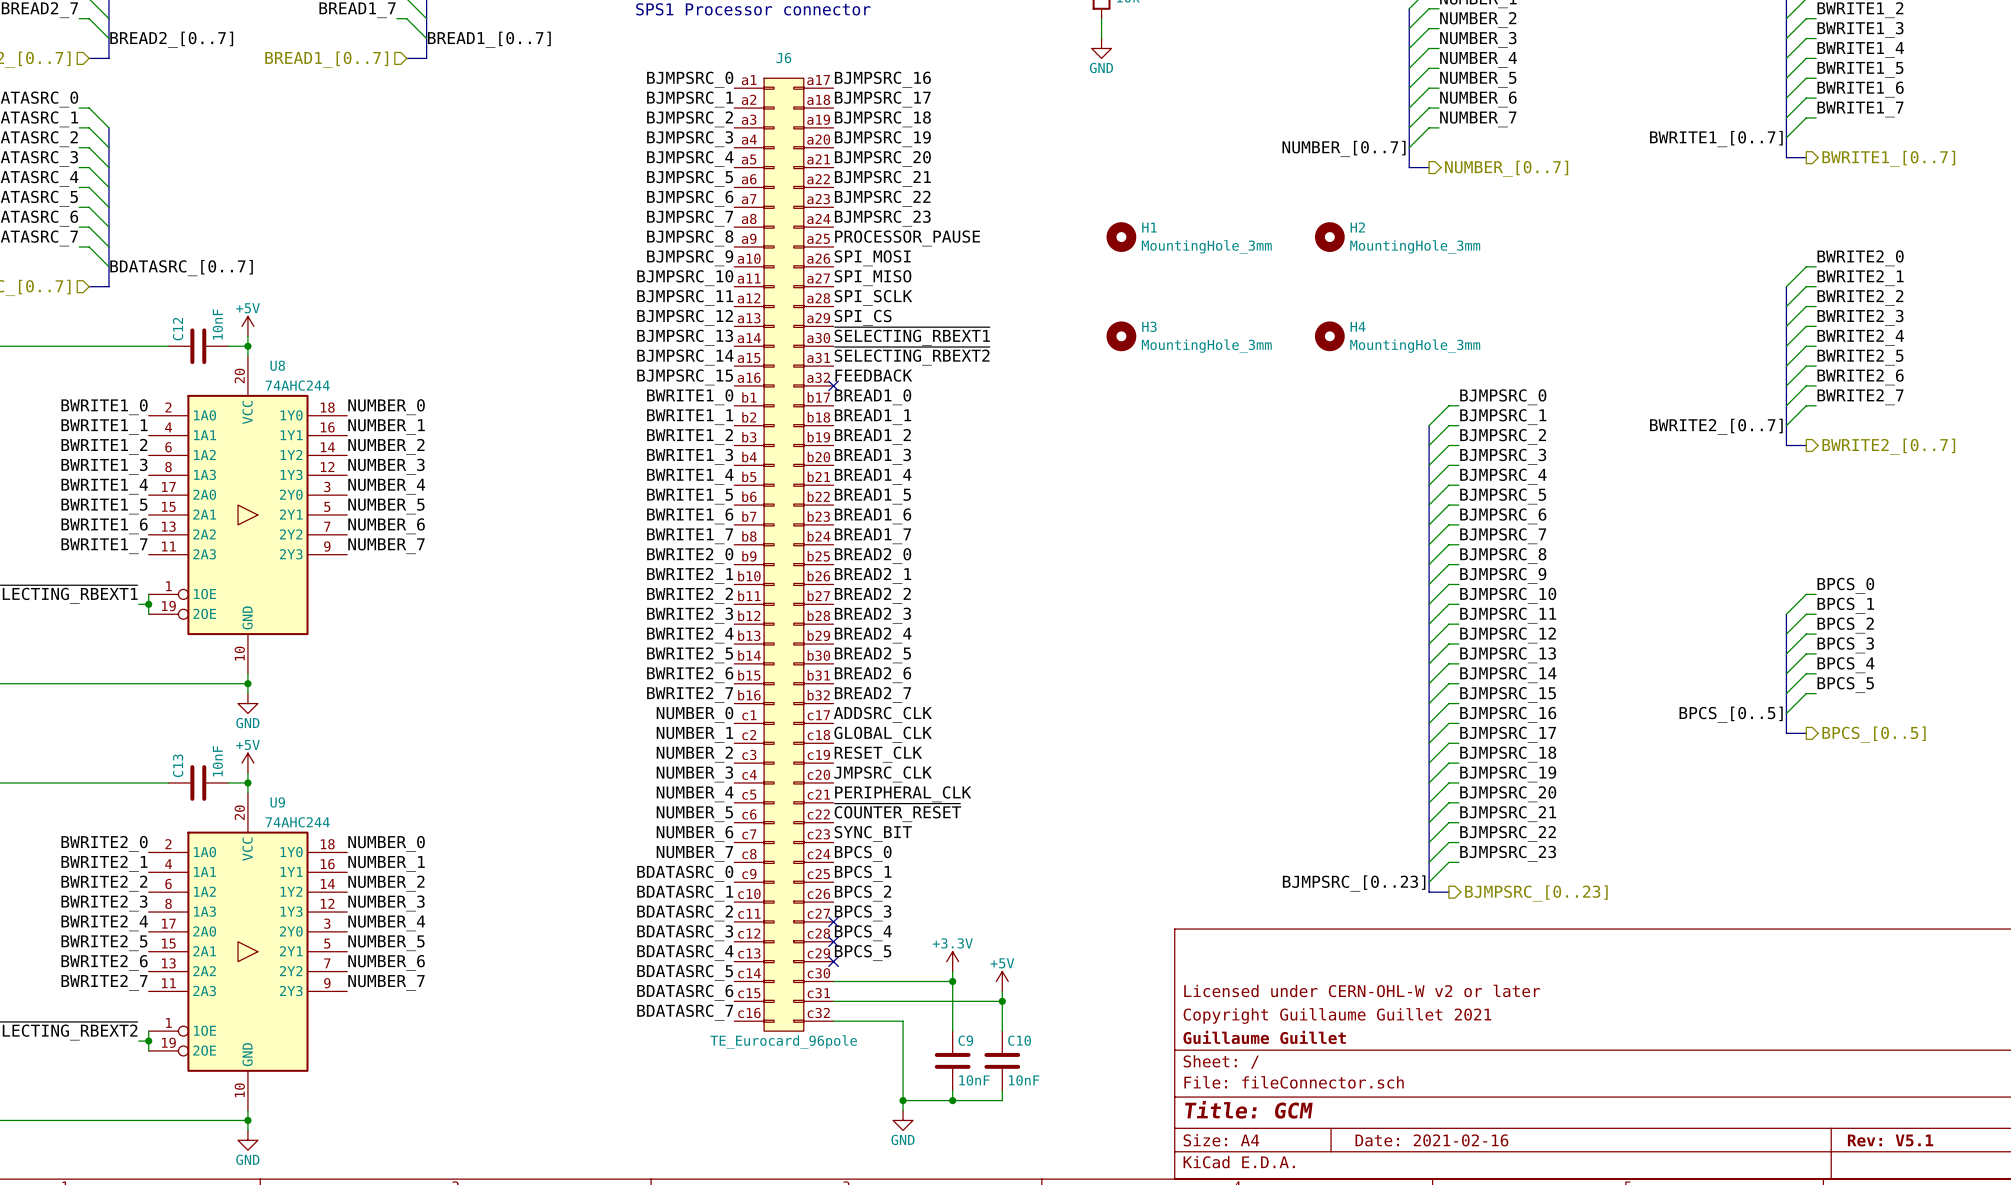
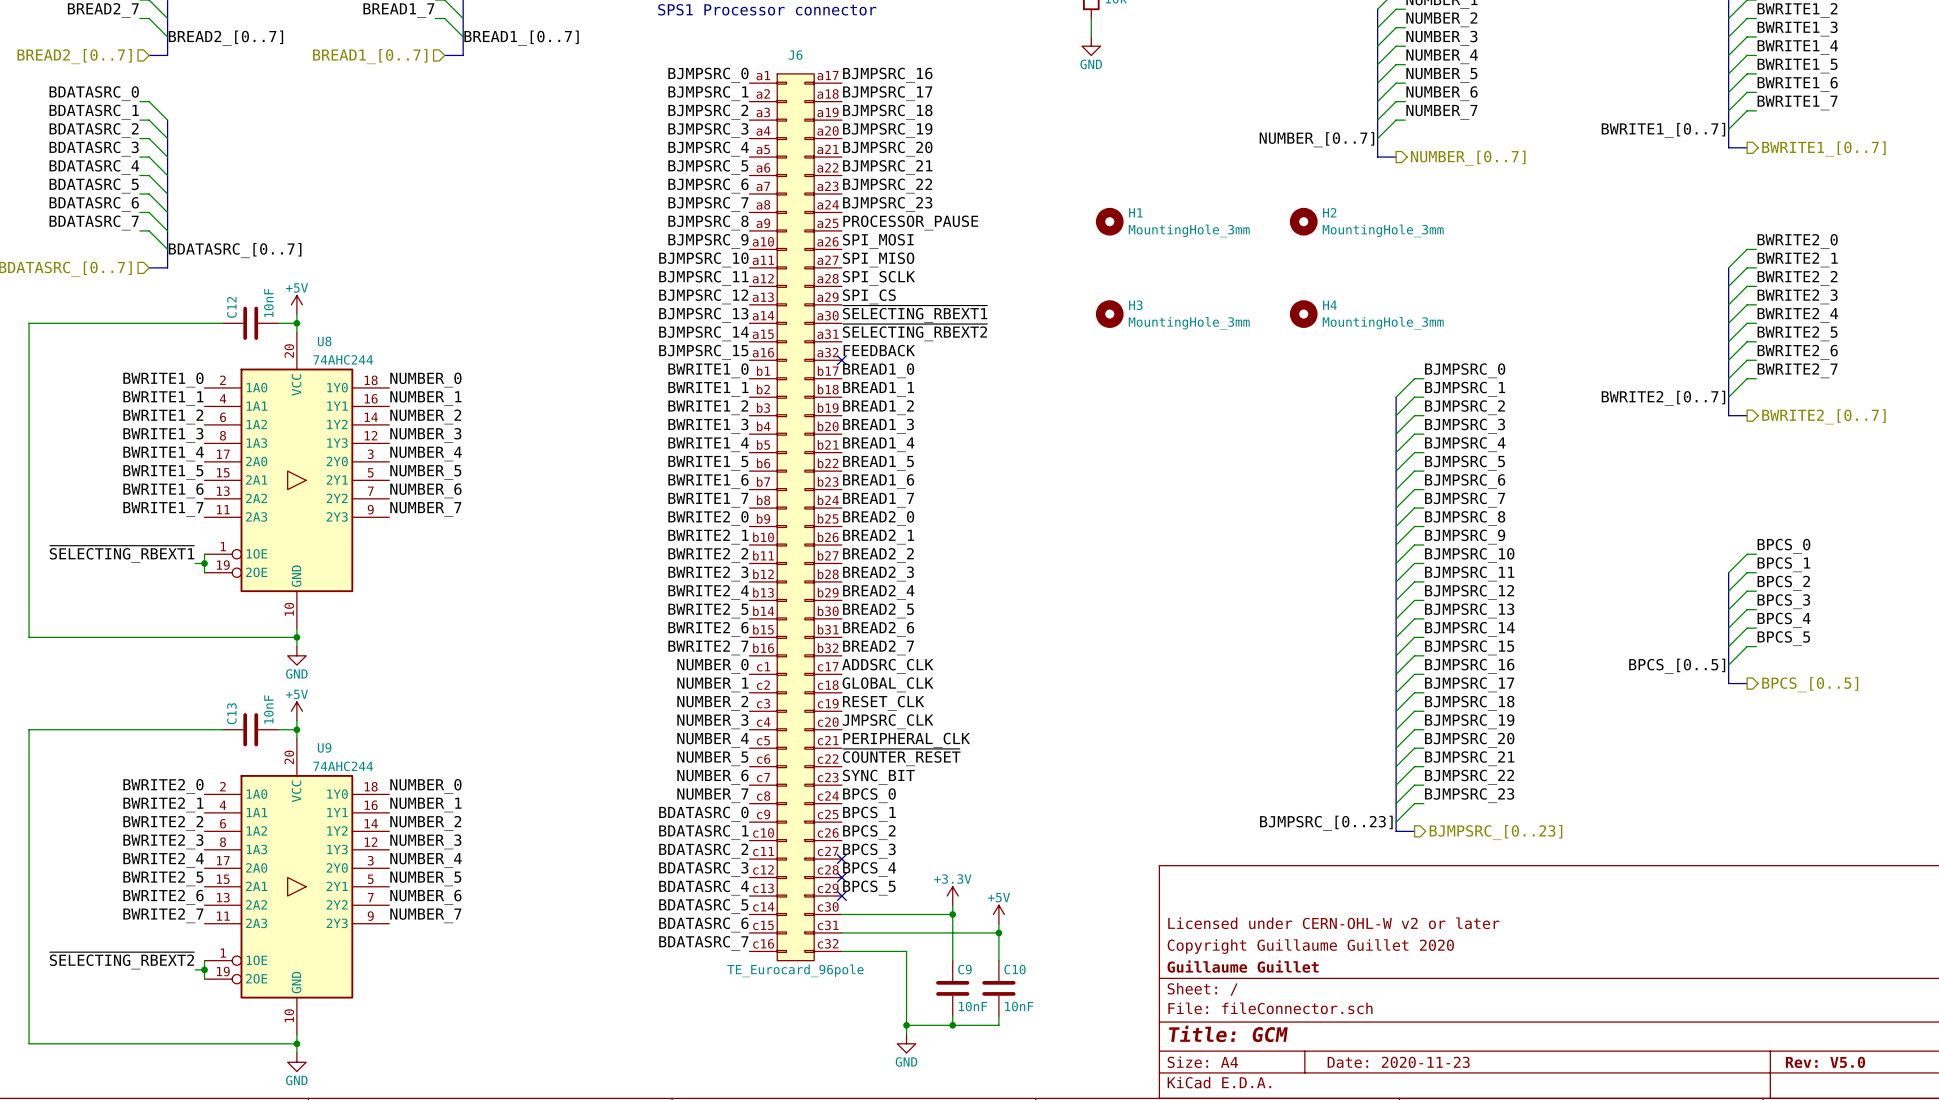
title block: Copyright Guillaume Guillet 2021 (1337, 1016) -> Copyright Guillaume Guillet 2020 (1310, 946)
title block: Date: 2021-02-16 (1431, 1140) -> Date: 2020-11-23 (1398, 1062)
title block: Rev: V5.1 (1890, 1140) -> Rev: V5.0 (1825, 1062)

